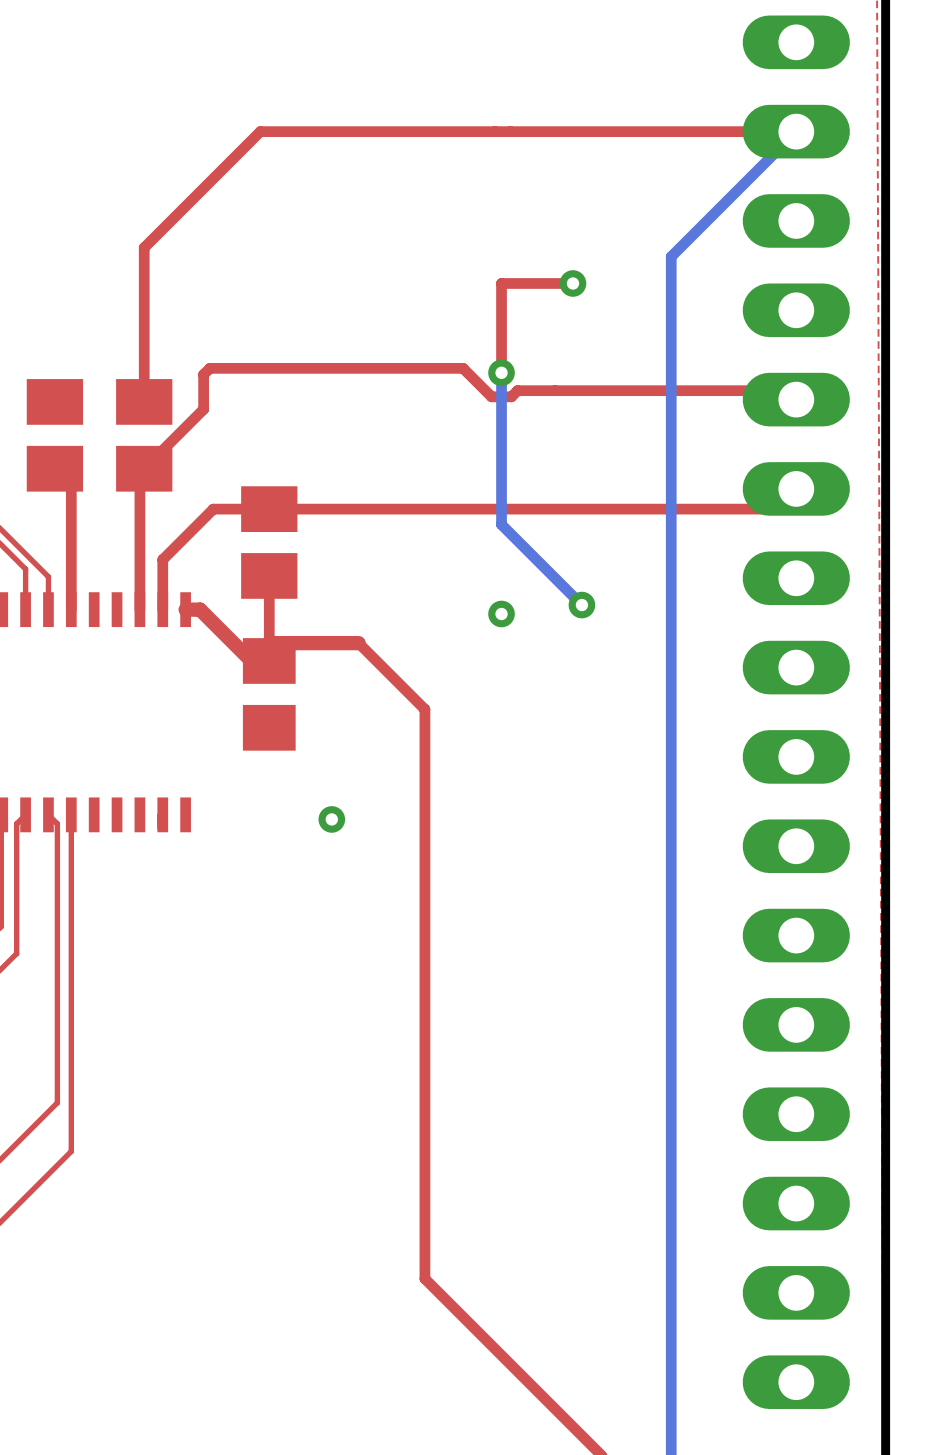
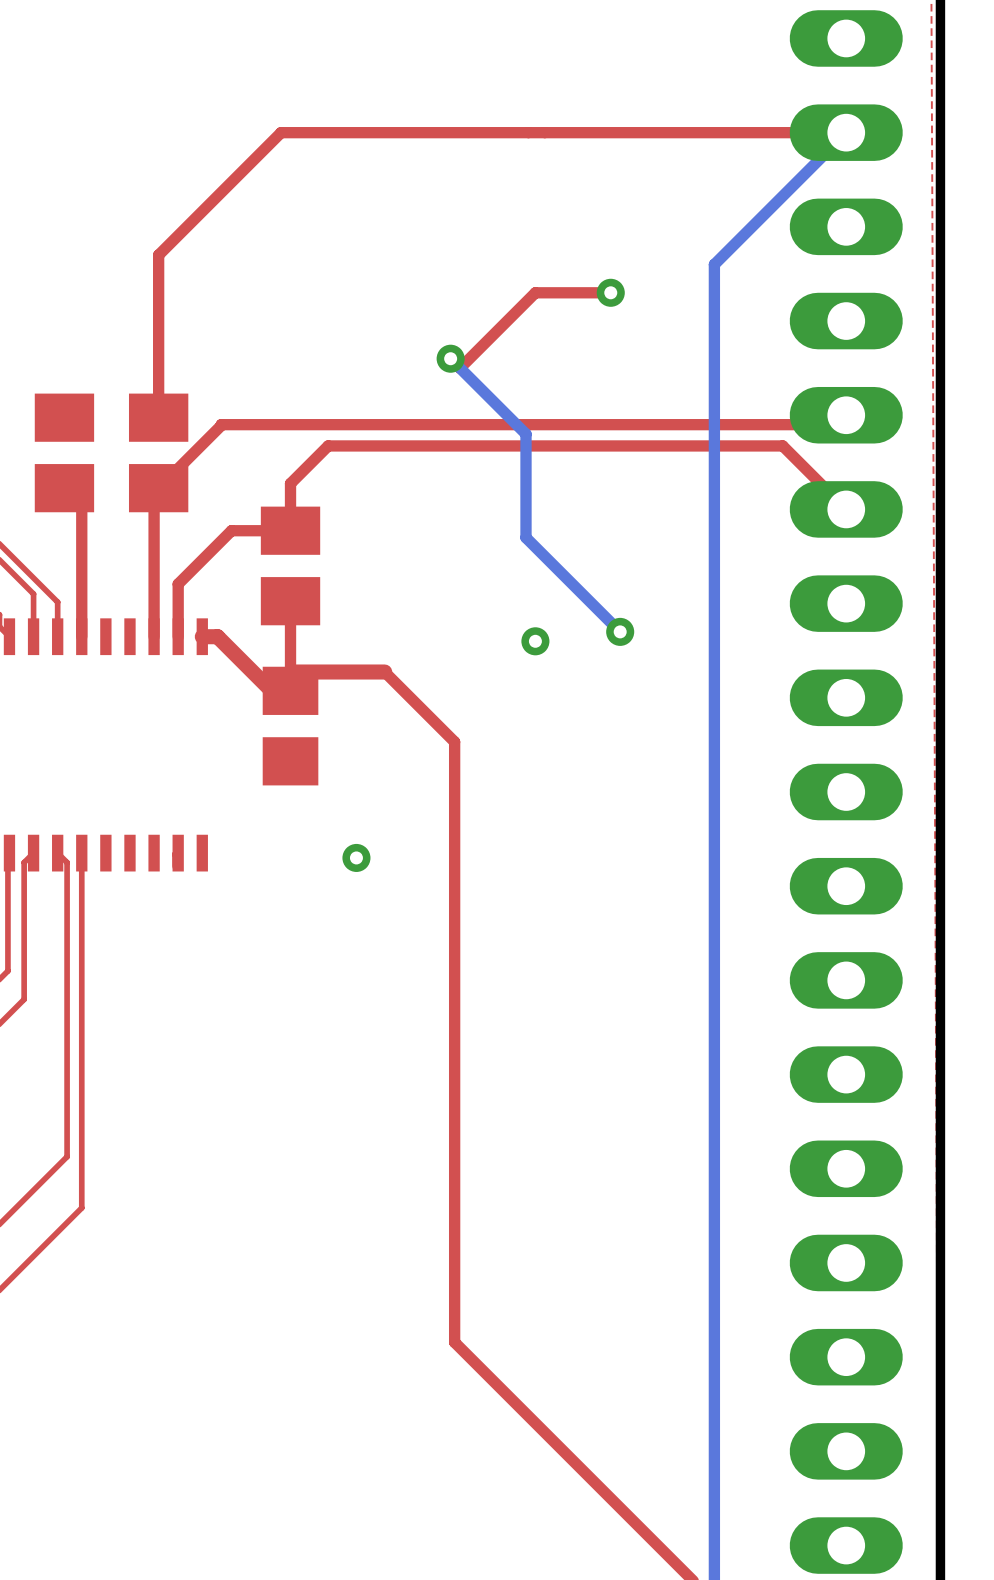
top track: (501, 283) (501, 372) -> (535, 292) (460, 368) (450, 358)
bottom track: (501, 372) (501, 524) -> (450, 358) (526, 434) (526, 537) (535, 547)
via position: (501, 372) -> (450, 358)
top track: (796, 399) (787, 390) (517, 390) (511, 396) (491, 396) (463, 368) (209, 368) (203, 374) (203, 408) -> (846, 415) (836, 424) (221, 424)
top track: (796, 488) (776, 509) (269, 509) -> (846, 509) (782, 445) (328, 445) (290, 483) (290, 530)

